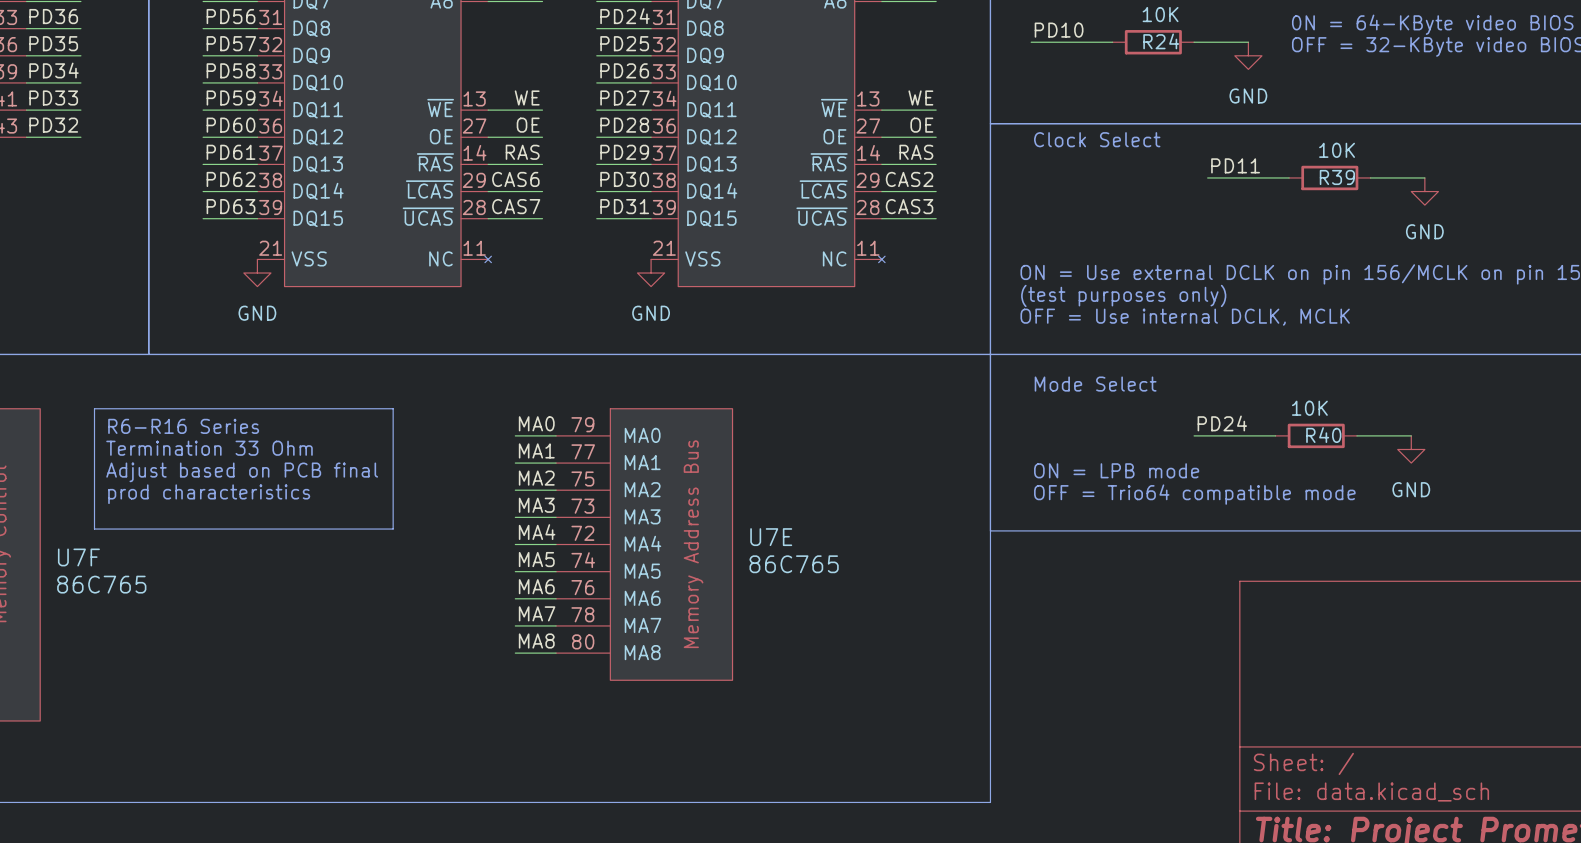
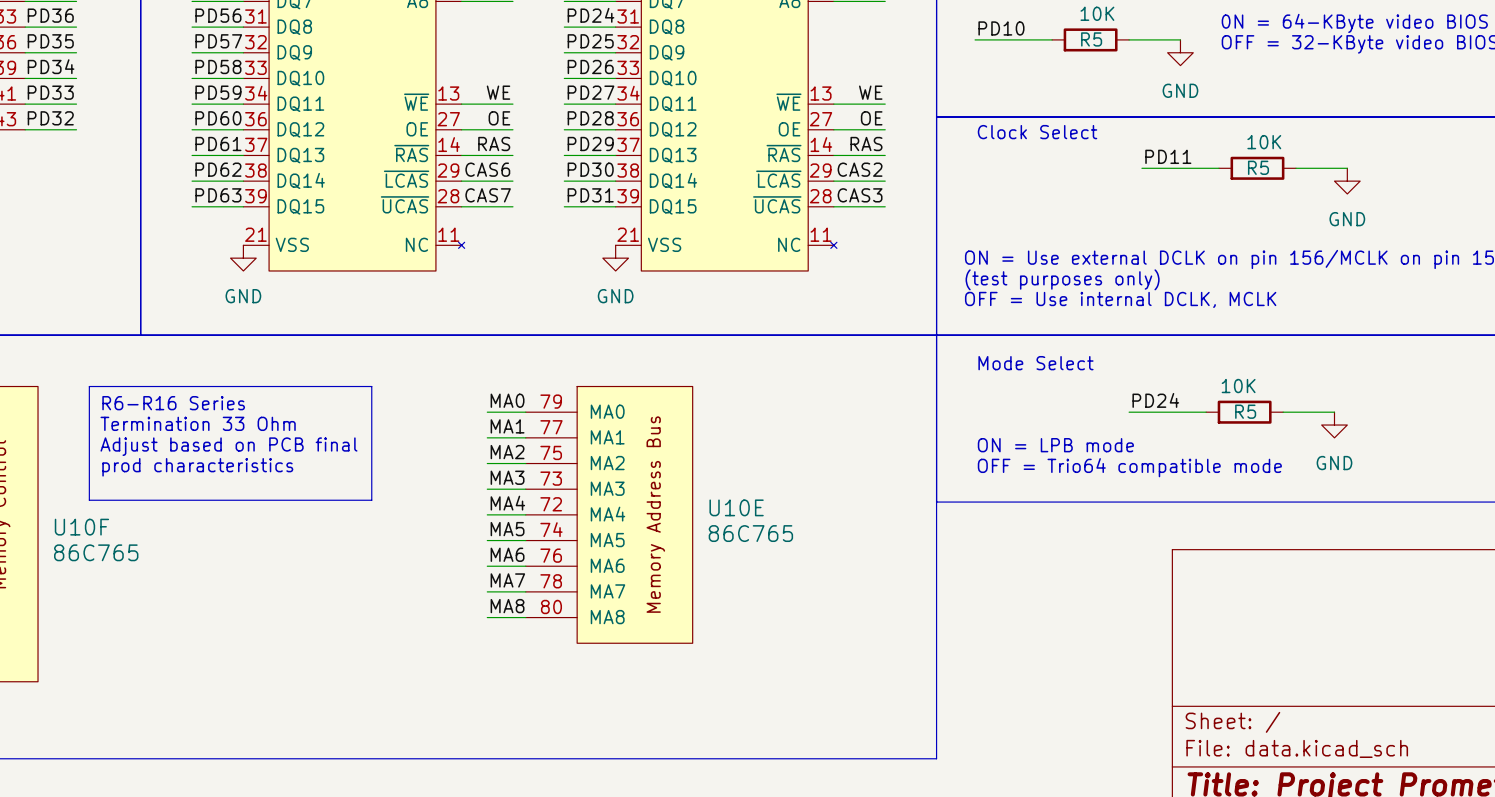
R24 name: R24 (1161, 41) -> R5 (1091, 39)
R39 name: R39 (1337, 177) -> R5 (1258, 167)
R40 name: R40 (1323, 435) -> R5 (1245, 411)
U7E name: U7E (771, 537) -> U10E (736, 507)
U7F name: U7F (78, 557) -> U10F (81, 527)

